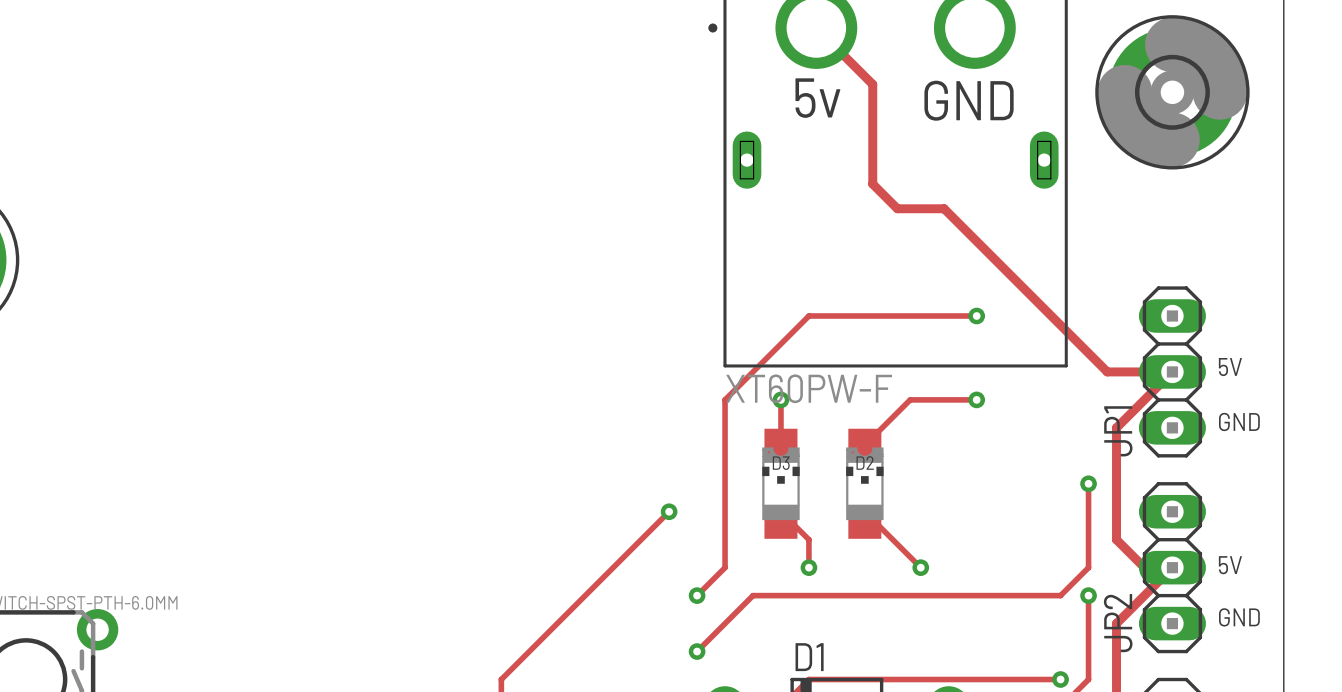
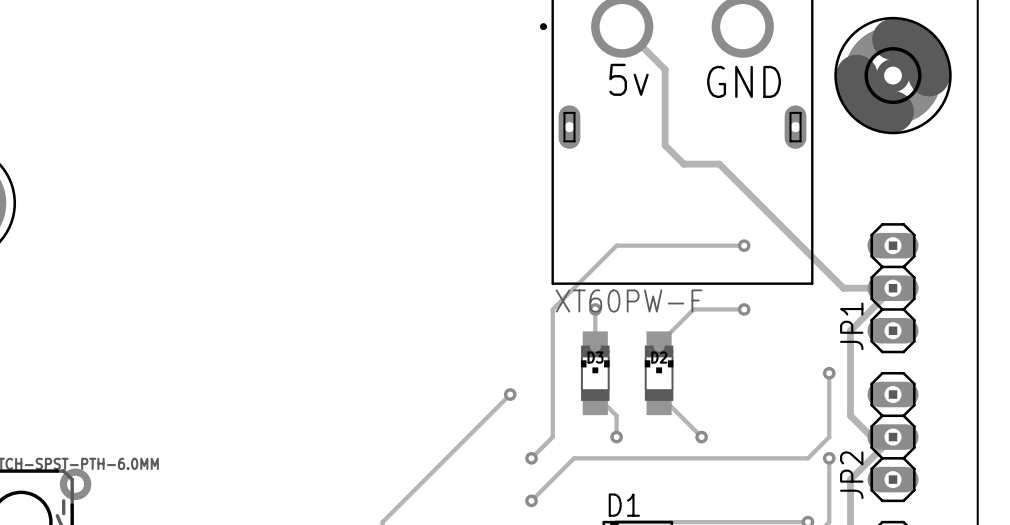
text: 5V (1230, 367) -> none
text: GND (1239, 421) -> none
text: 5V (1230, 565) -> none
text: GND (1239, 617) -> none

